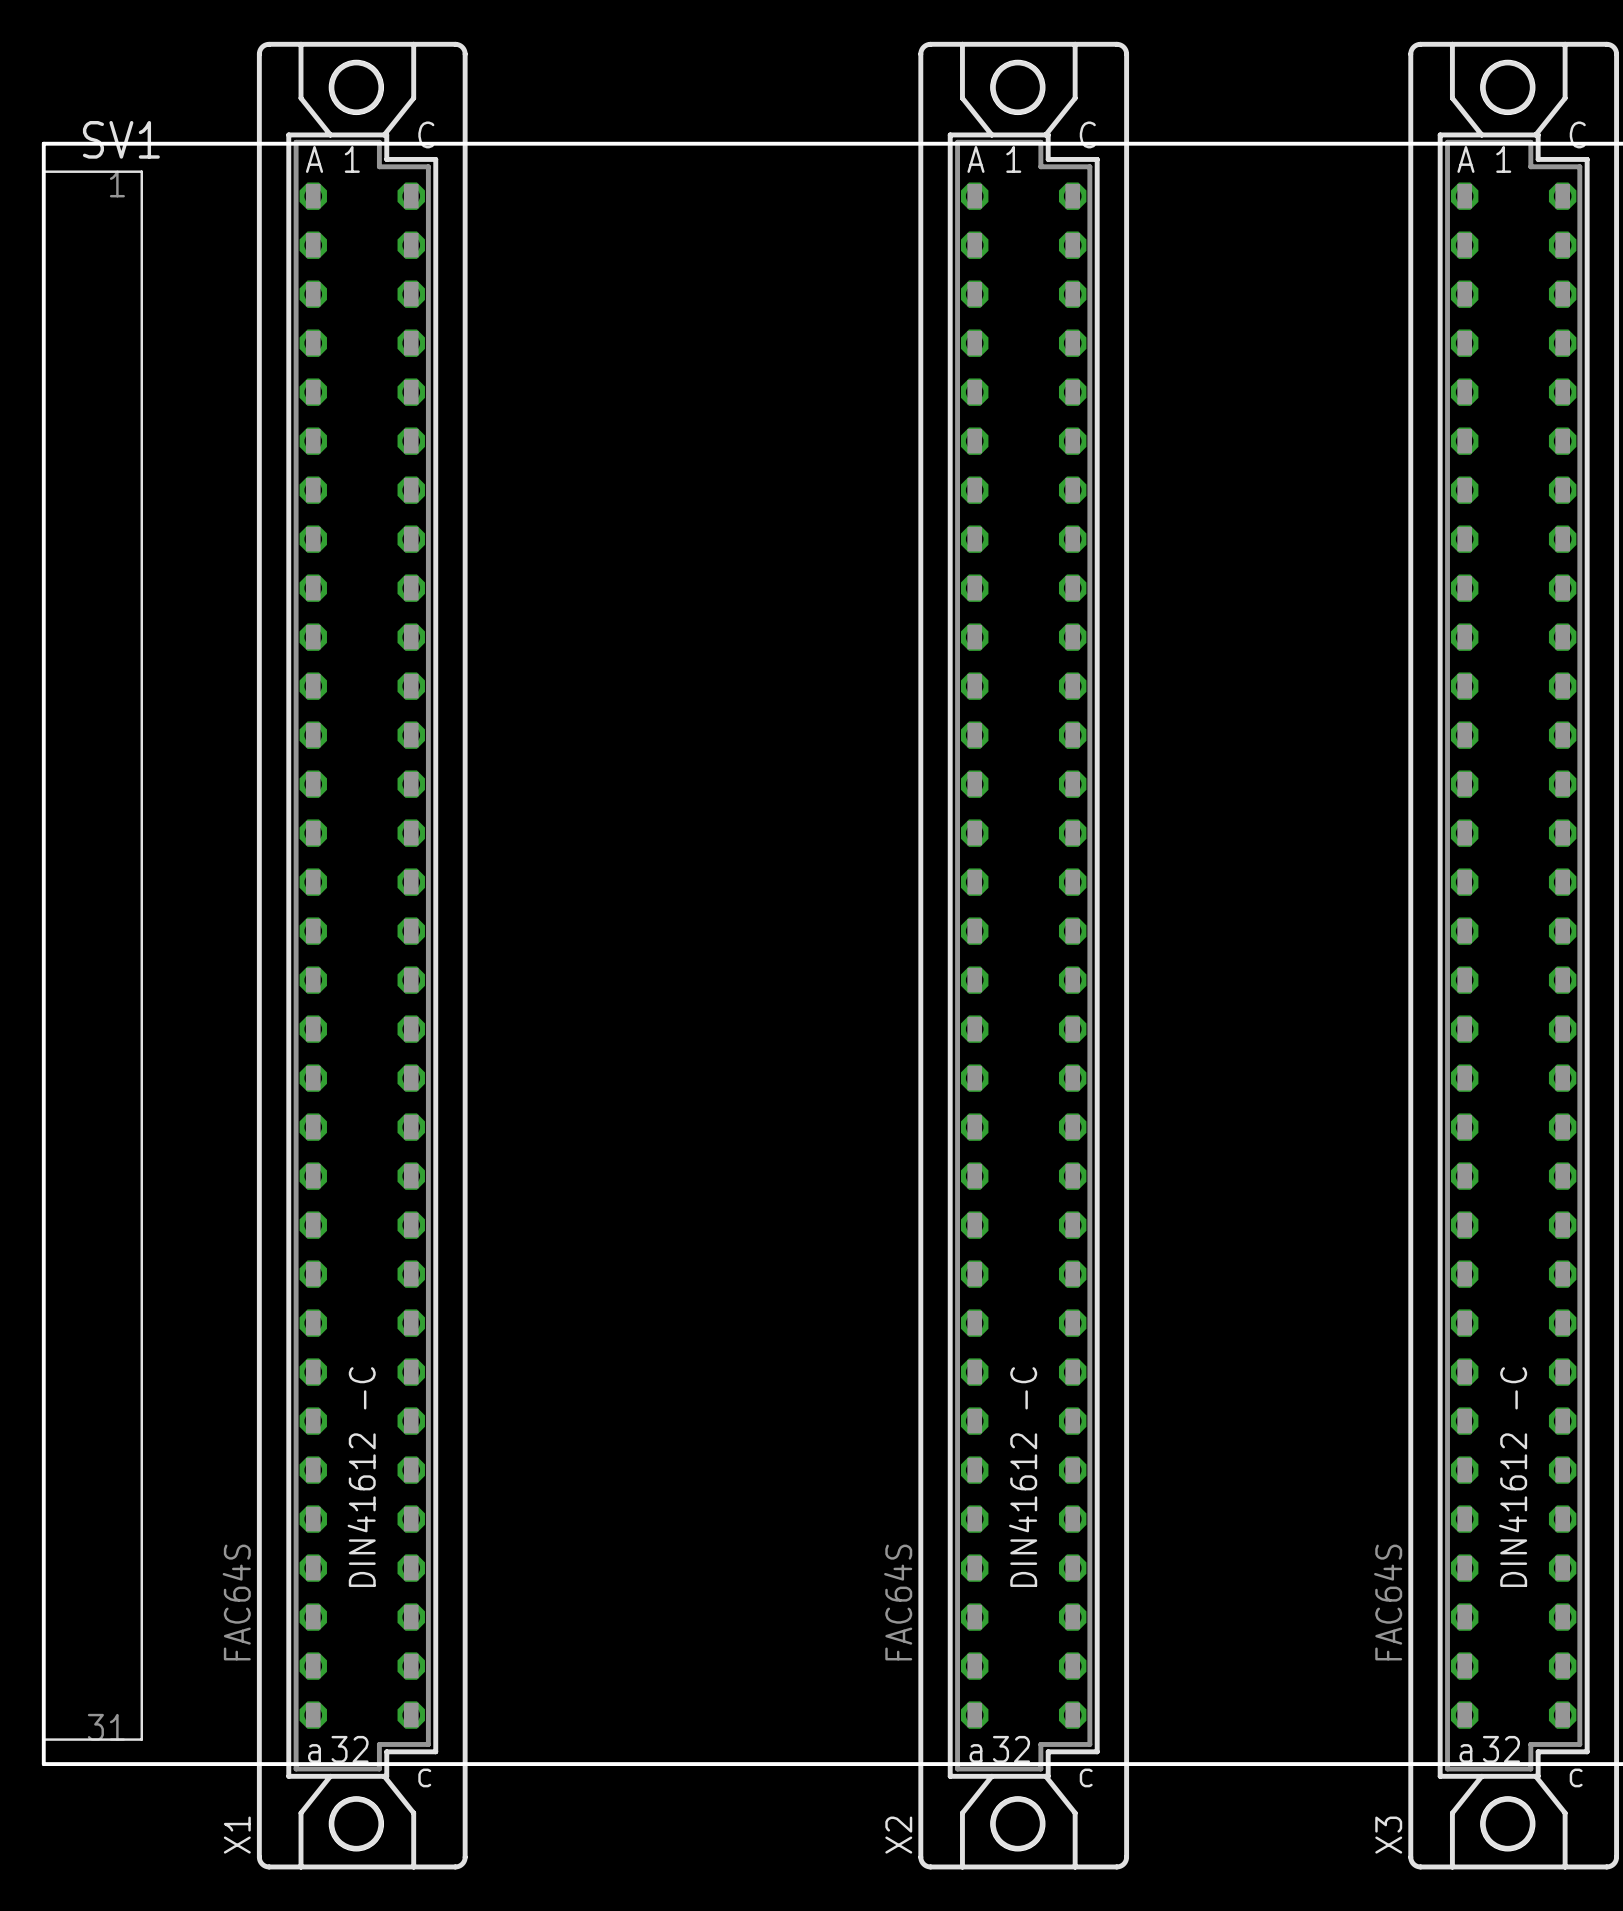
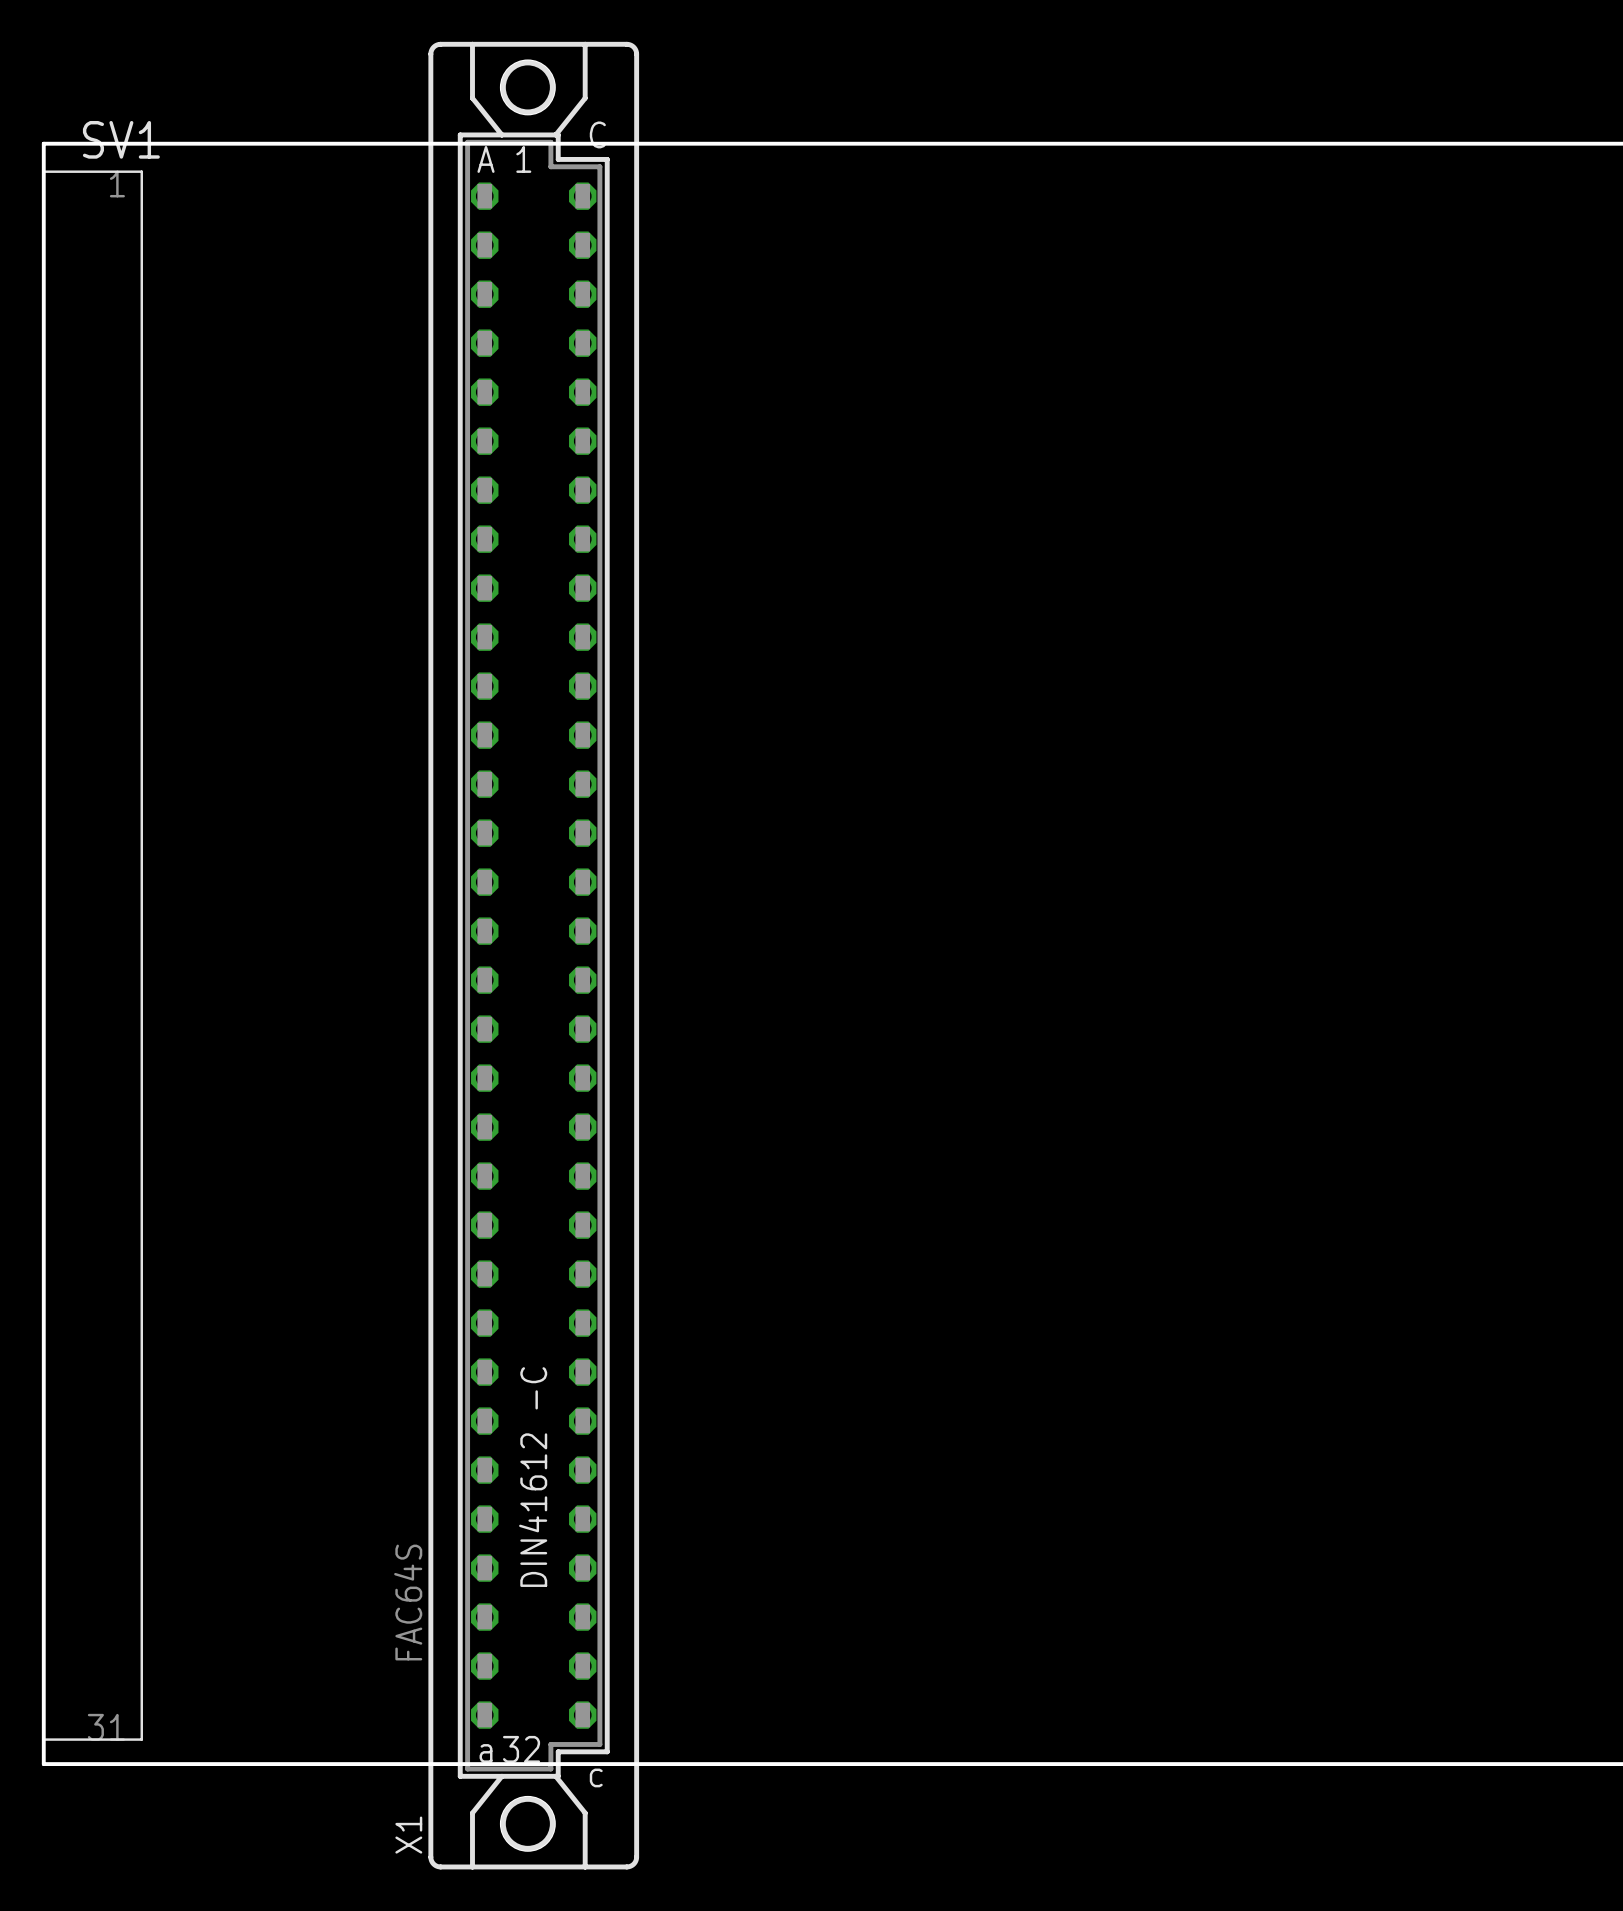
X1 position: (362, 955) -> (533, 955)
X2: FAC64S (1023, 955) -> none
X3: FAC64S (1513, 955) -> none

